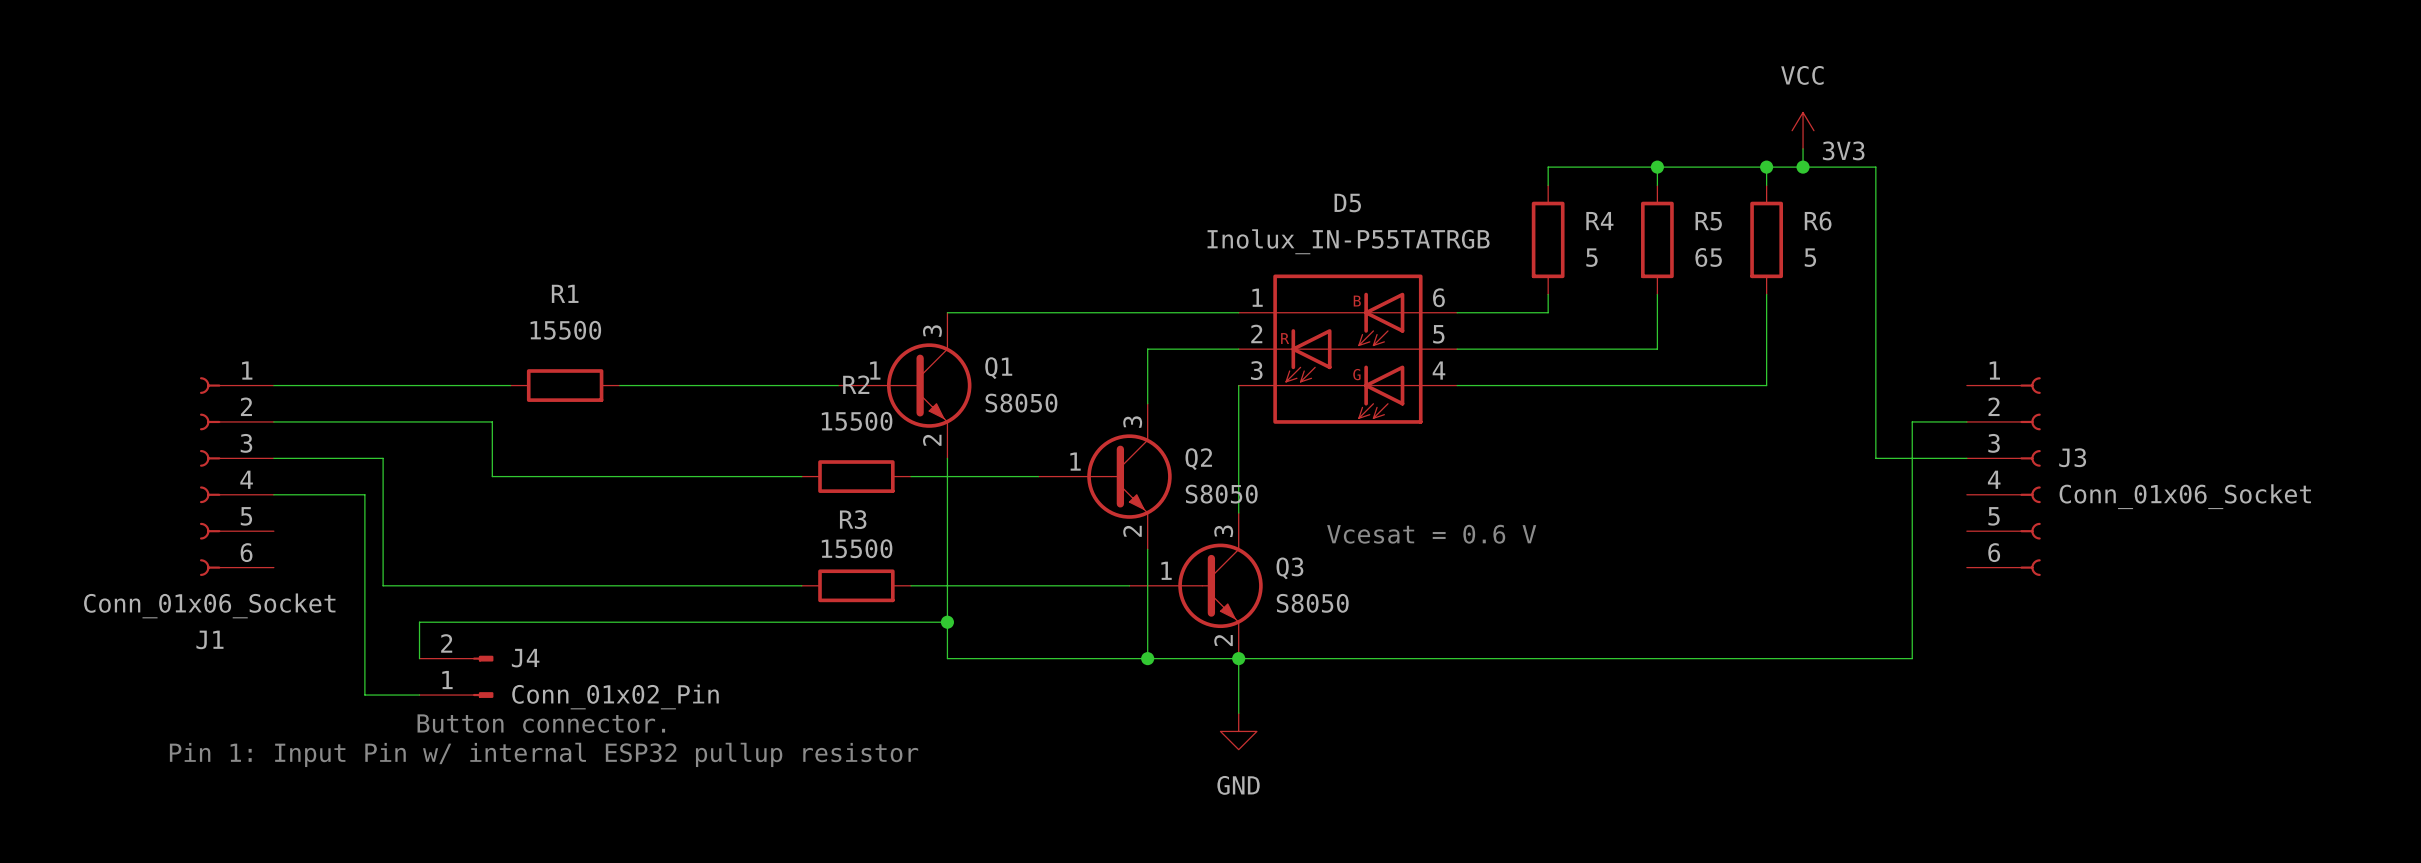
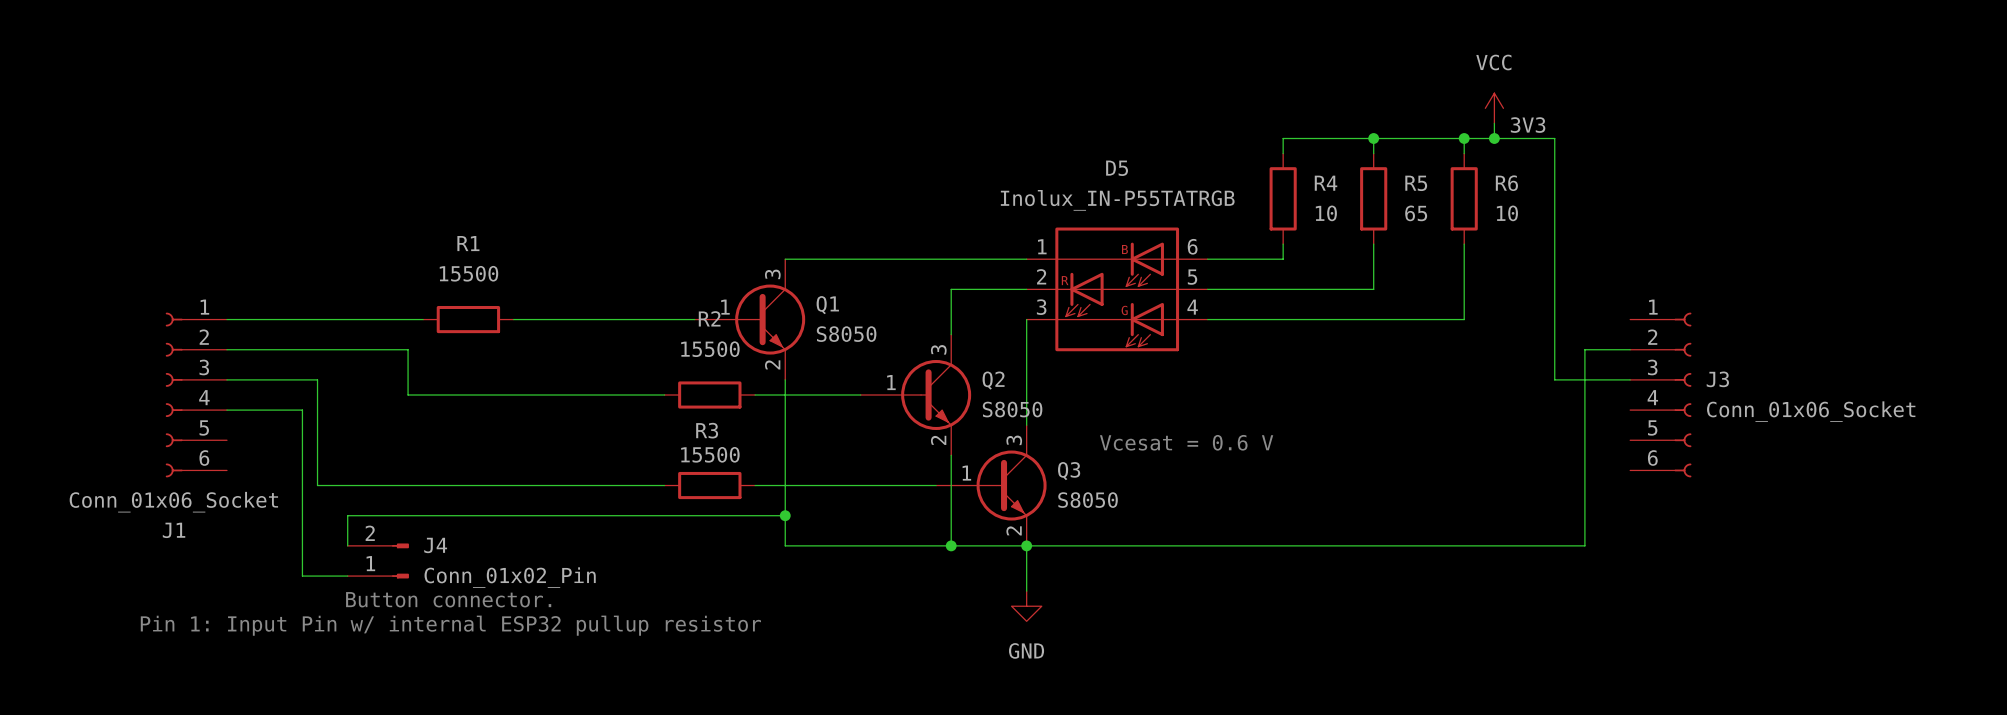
R4 value: 5 (1591, 257) -> 10 (1326, 213)
R6 value: 5 (1810, 257) -> 10 (1507, 213)

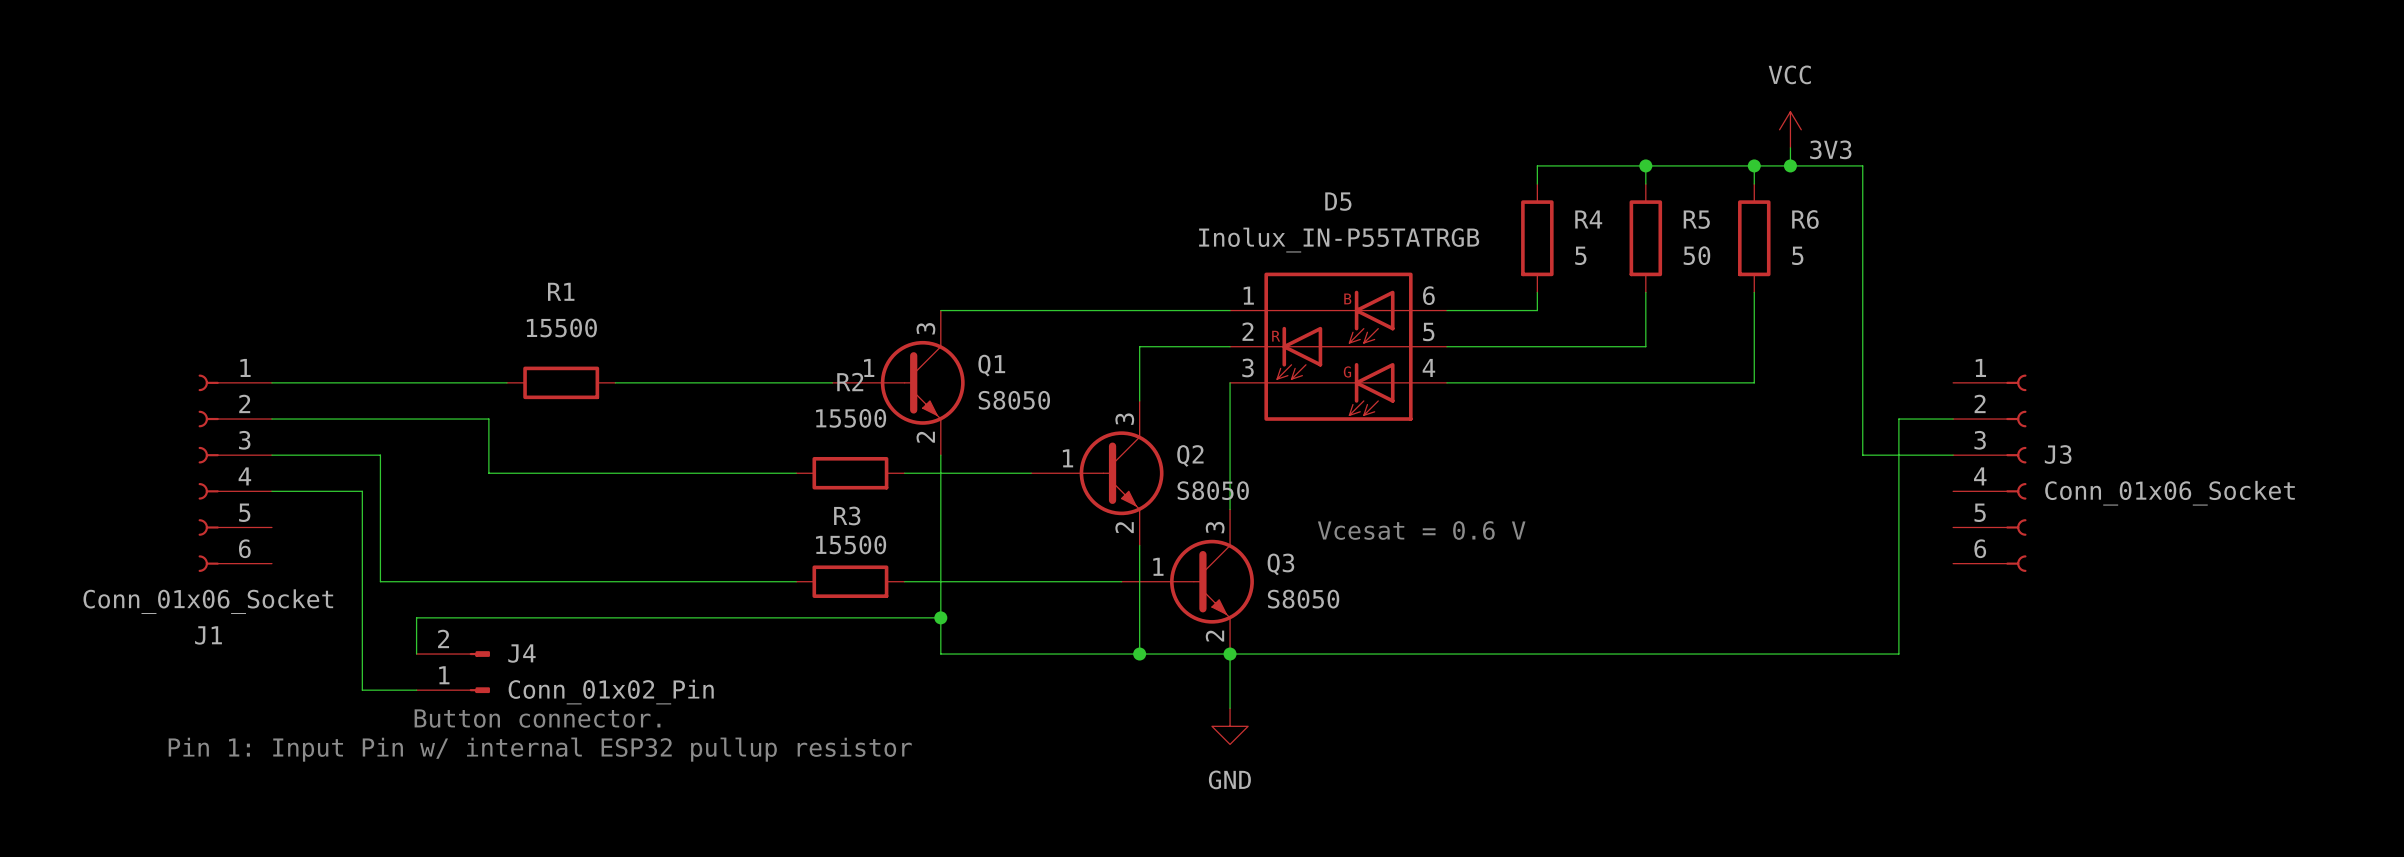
R4 value: 10 (1326, 213) -> 5 (1580, 255)
R5 value: 65 (1416, 213) -> 50 (1696, 255)
R6 value: 10 (1507, 213) -> 5 (1797, 255)

